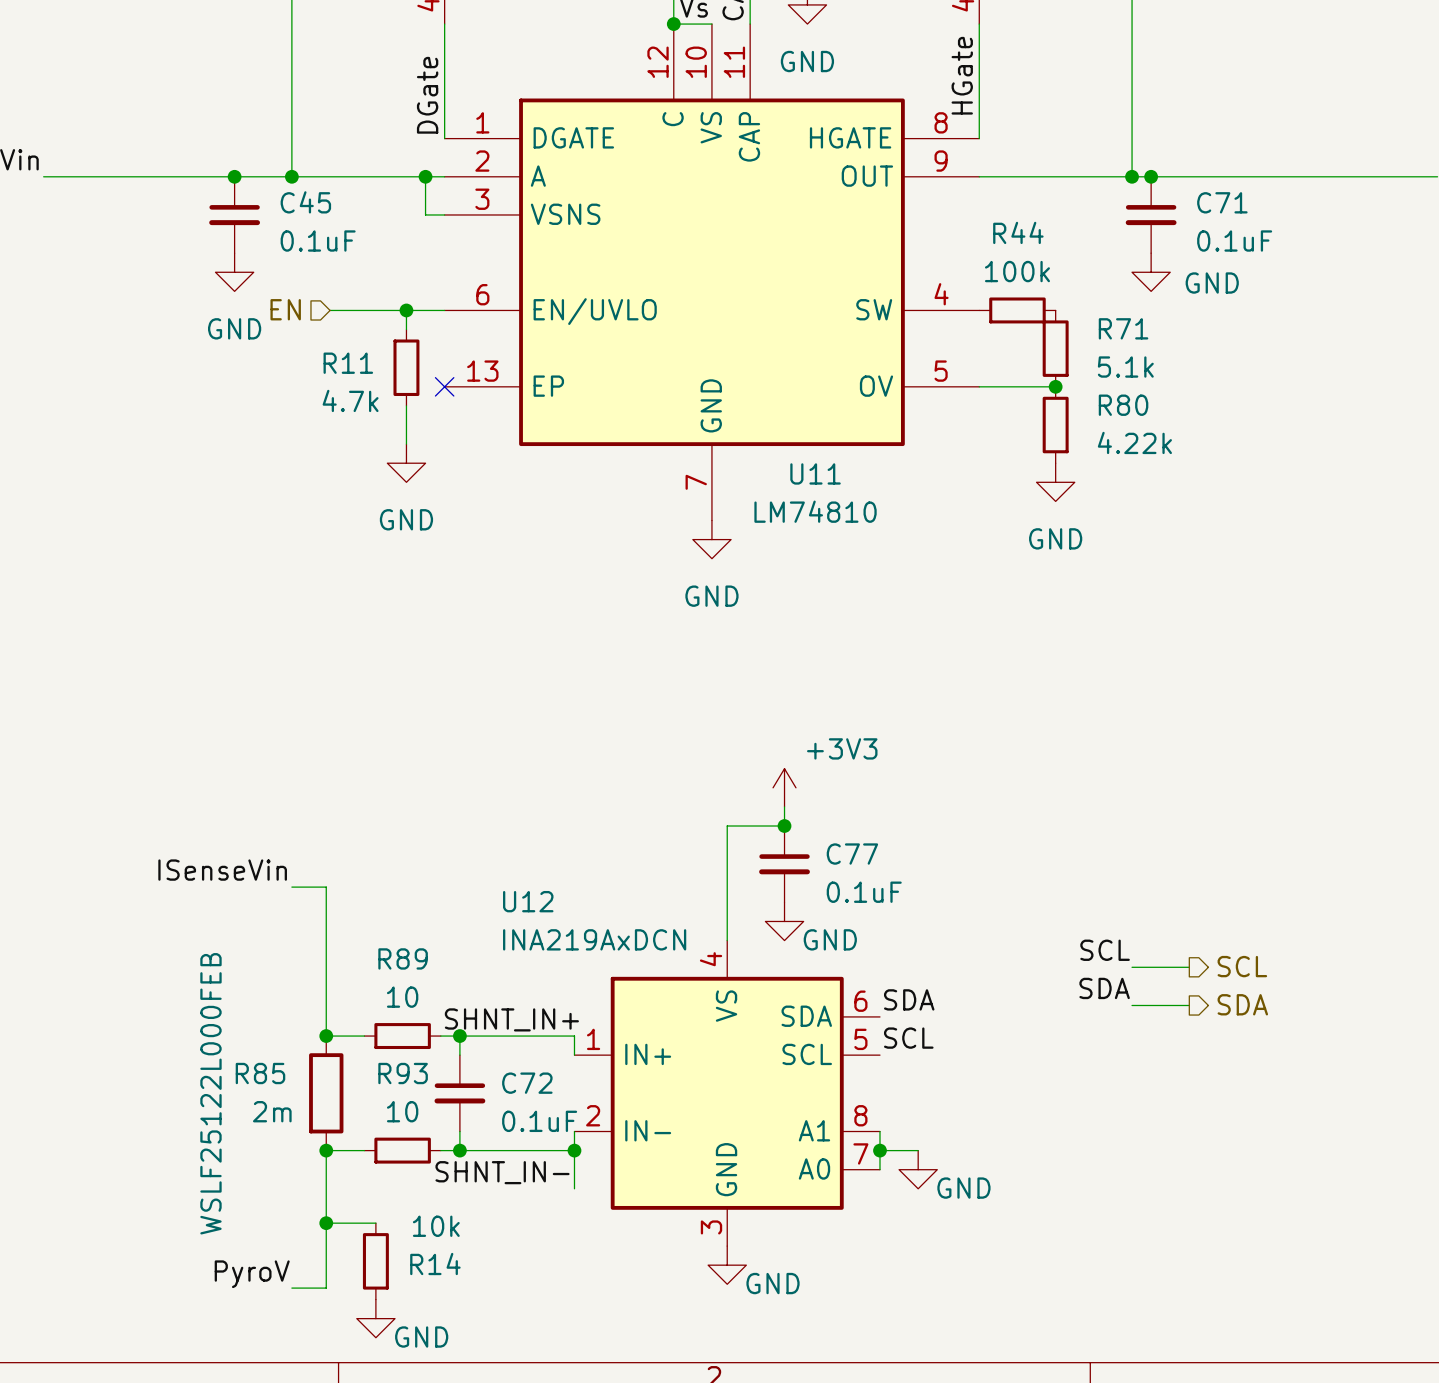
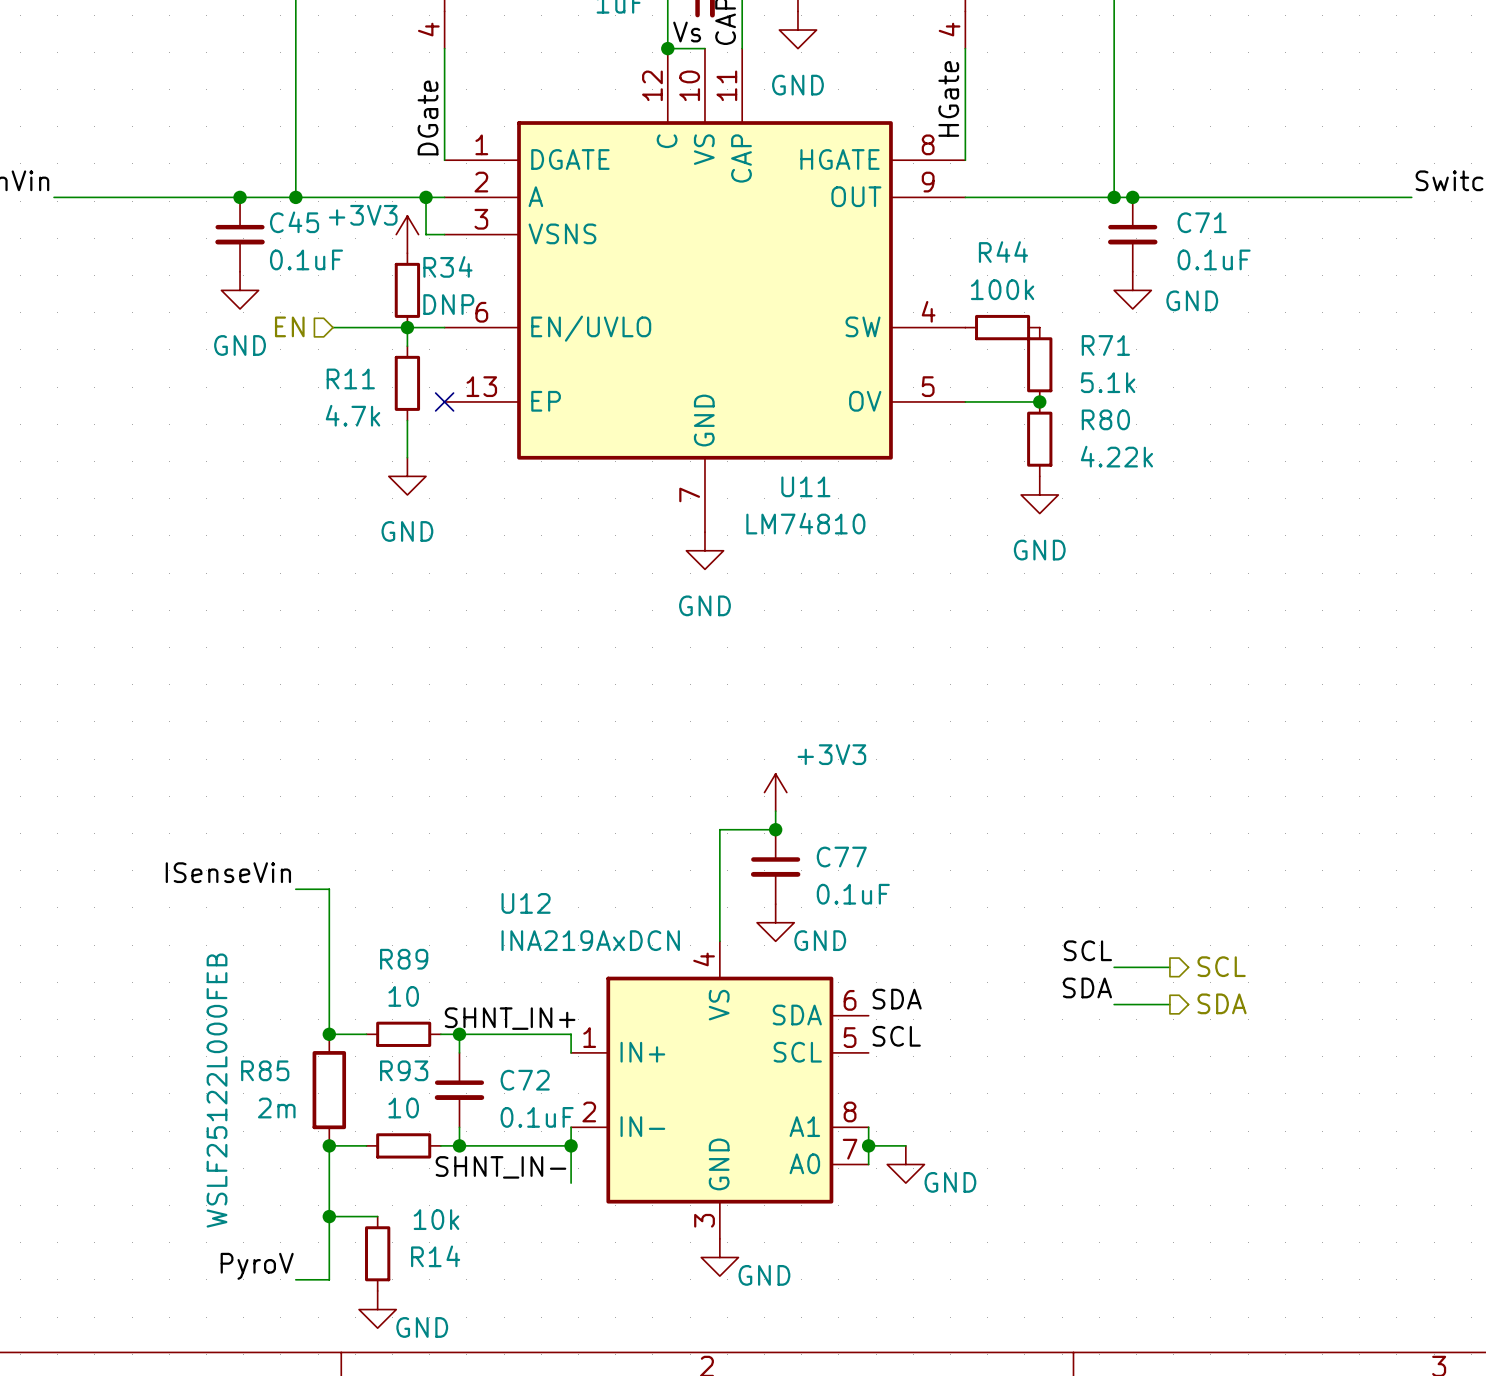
C45 name position: C45 (305, 202) -> C45 (294, 222)
power symbol: none -> +3V3 (407, 234)
C45 value position: 0.1uF (318, 241) -> 0.1uF (306, 259)
R34: none -> DNP (407, 290)

